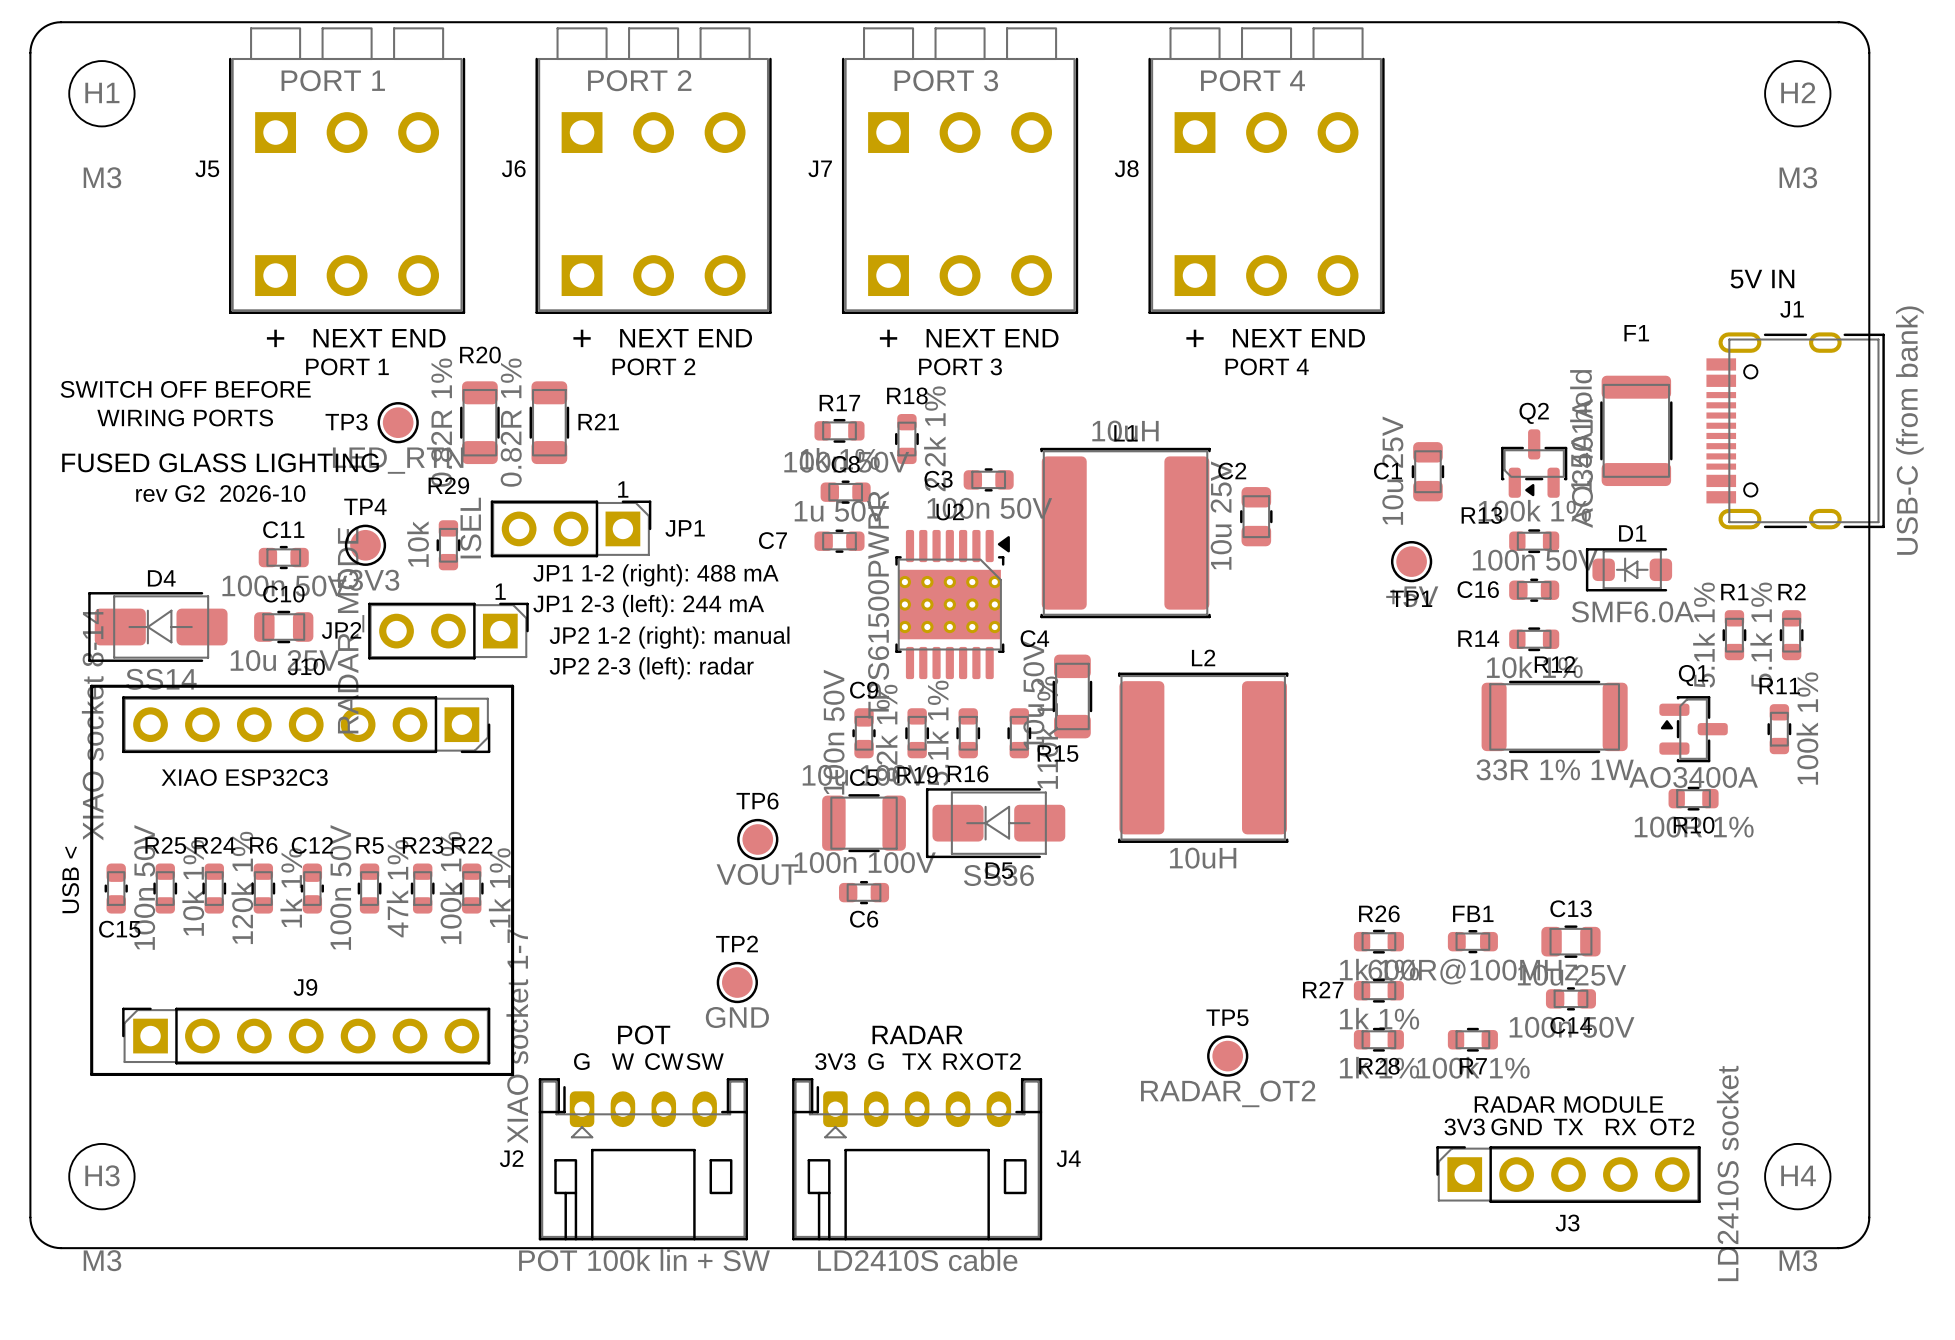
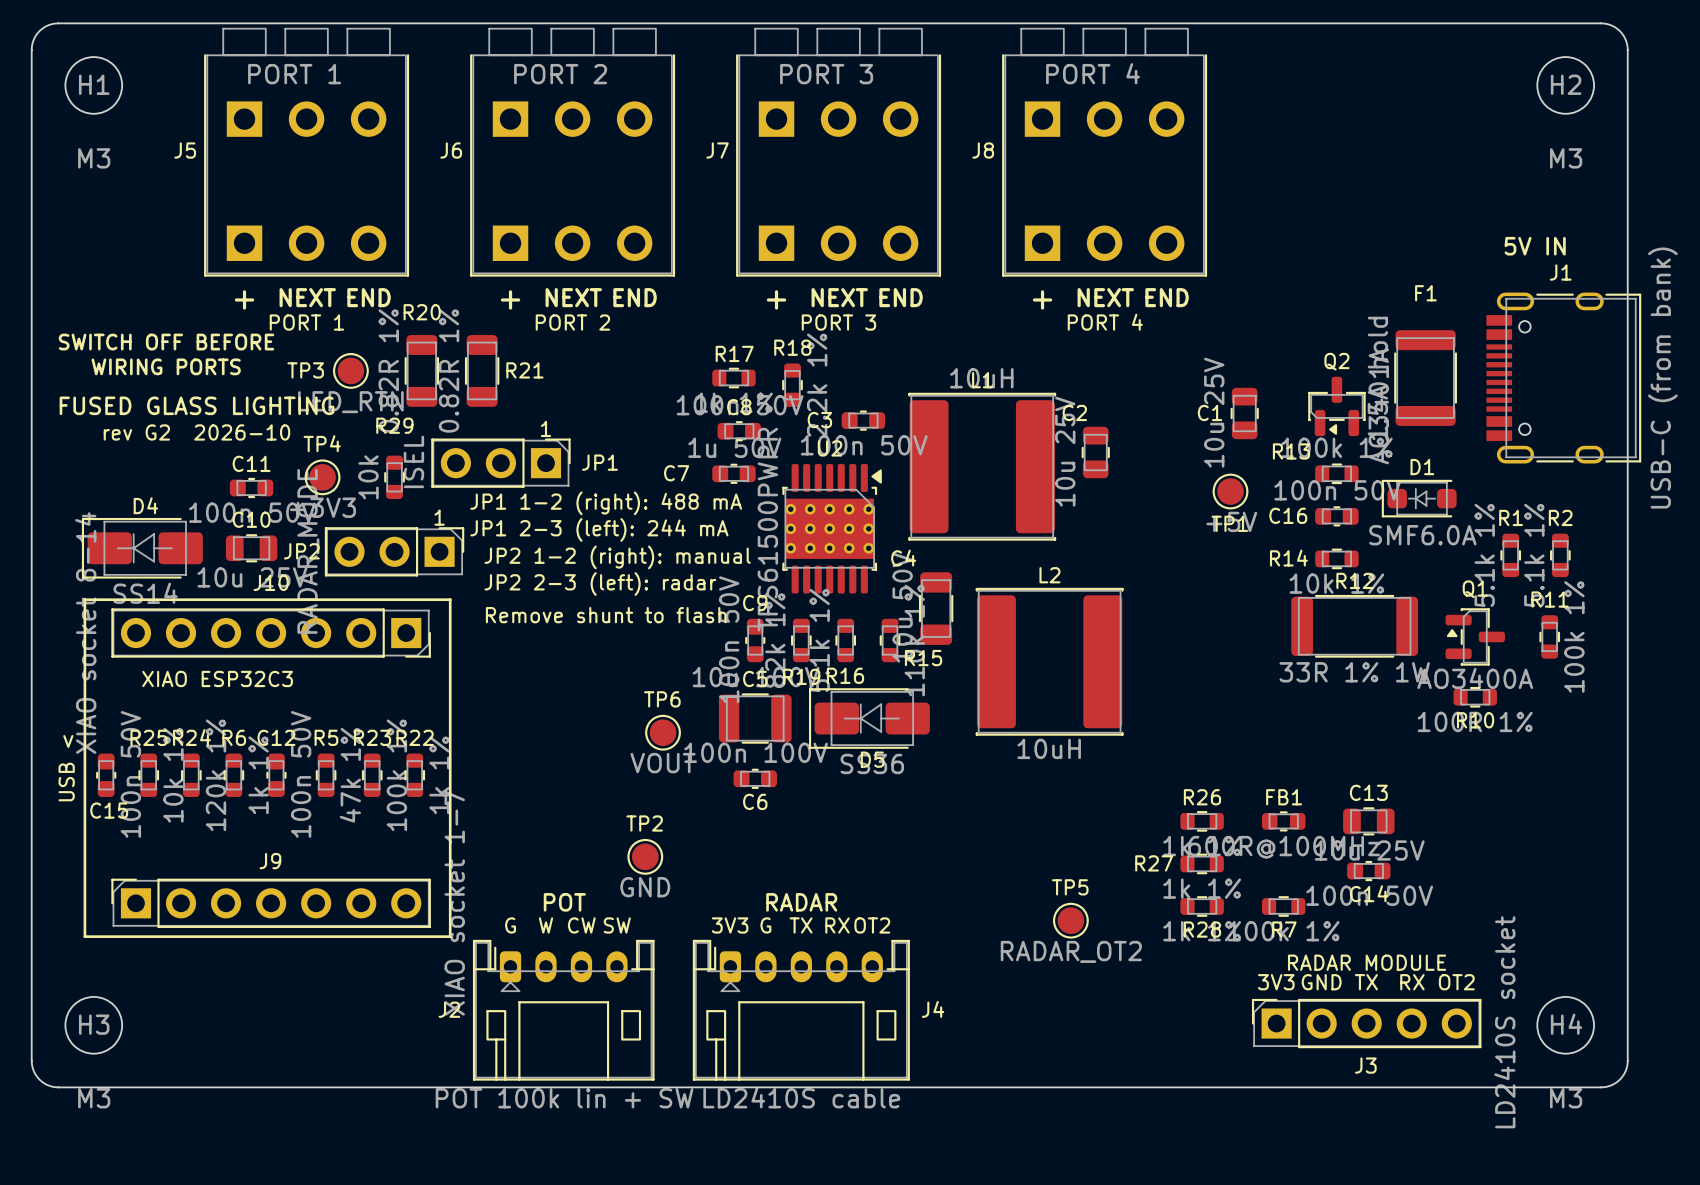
text: none -> Remove shunt to flash (606, 615)

